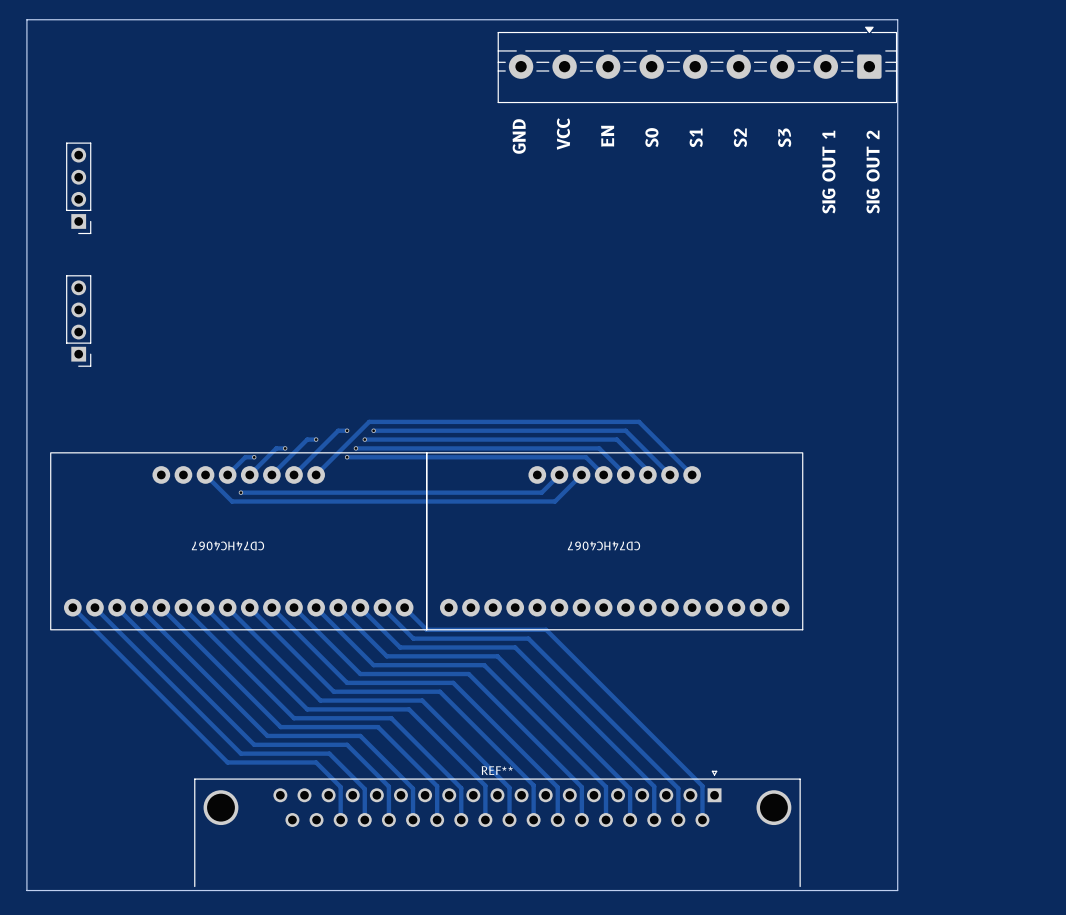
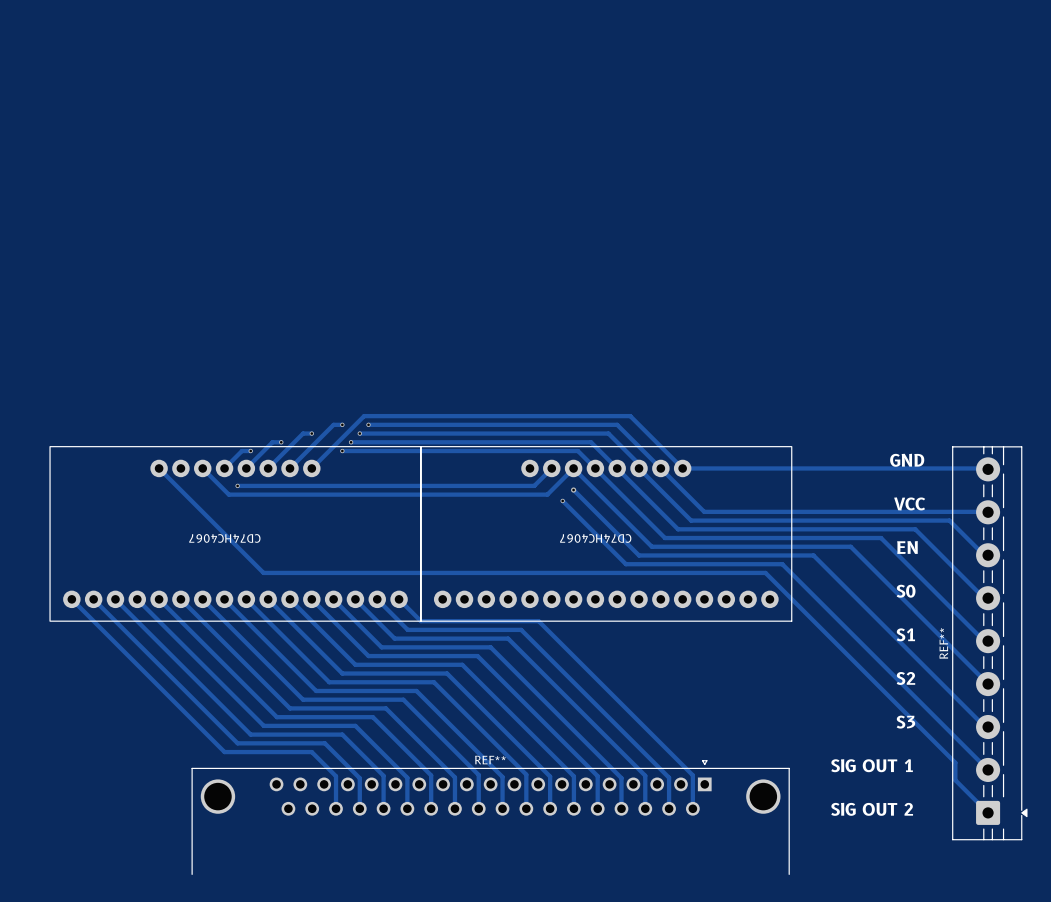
board edge: (26, 19) (897, 19) (897, 890) (26, 890) (26, 19) -> none
part: (697, 64) -> none
text: VCC (563, 134) -> none
text: GND (519, 136) -> none
text: EN (607, 136) -> none
text: S0 (651, 137) -> none
text: S1 (696, 137) -> none
text: S2 (740, 137) -> none
text: S3 (784, 137) -> none
text: SIG OUT 1 (828, 172) -> none
text: SIG OUT 2 (873, 172) -> none
part: (78, 188) -> none
part: (78, 321) -> none
text: none -> GND (907, 460)
track: none -> (159, 468) (263, 572) (765, 572) (955, 762) (955, 780) (988, 812)
track: none -> (573, 468) (651, 546) (850, 546) (988, 684)
track: none -> (595, 468) (664, 538) (881, 538) (983, 640)
track: none -> (617, 468) (678, 529) (915, 529) (983, 597)
track: none -> (639, 468) (691, 520) (949, 520) (983, 554)
track: none -> (660, 468) (704, 511) (983, 511)
track: none -> (682, 468) (983, 468)
track: none -> (573, 490) (639, 555) (813, 555) (985, 727) (988, 727)
via: none -> (573, 490)
track: none -> (562, 500) (625, 564) (782, 564) (988, 769)
via: none -> (562, 500)
text: none -> VCC (909, 503)
text: none -> EN (907, 547)
text: none -> S0 (906, 591)
text: none -> S1 (905, 634)
REF**: none -> (989, 643)
text: none -> S2 (905, 678)
text: none -> S3 (905, 722)
text: none -> SIG OUT 1 (872, 765)
text: none -> SIG OUT 2 (872, 809)

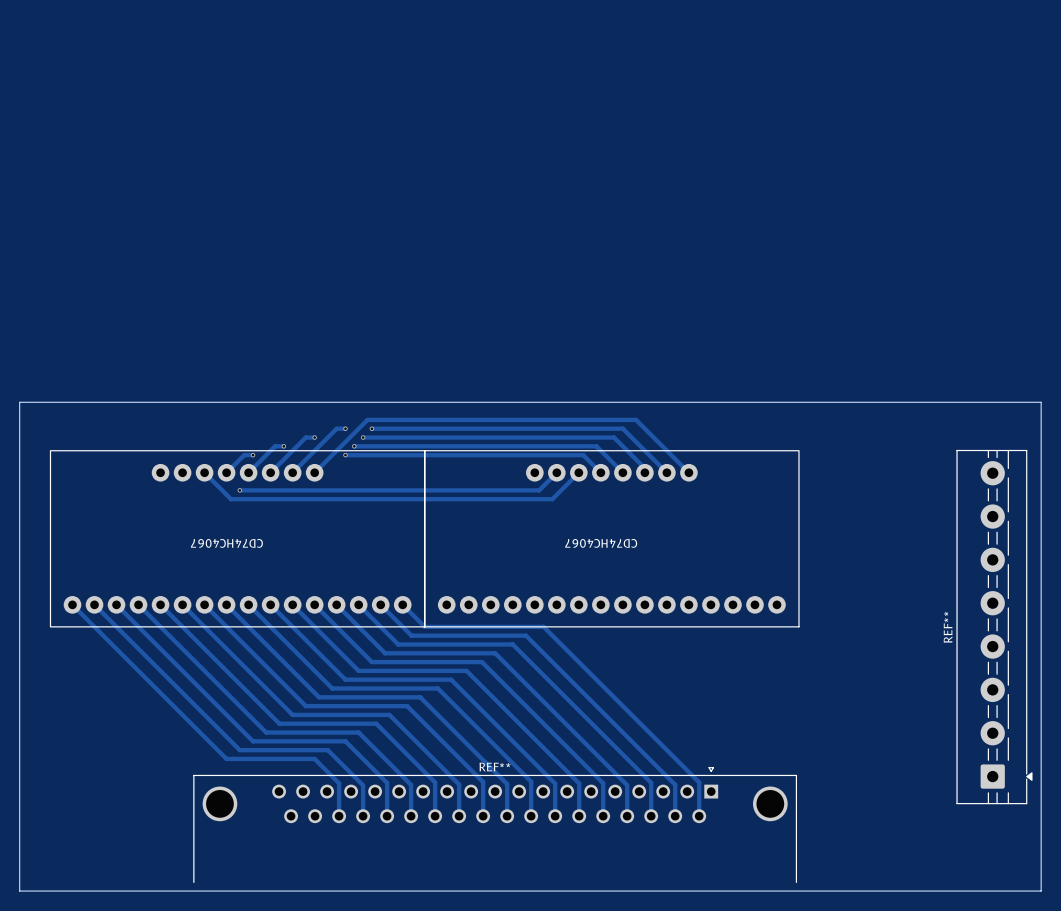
board edge: none -> (19, 402) (1041, 402) (1041, 891) (19, 891) (19, 402)
text: GND (907, 460) -> none
track: (159, 468) (263, 572) (765, 572) (955, 762) (955, 780) (988, 812) -> none
track: (573, 468) (651, 546) (850, 546) (988, 684) -> none
track: (595, 468) (664, 538) (881, 538) (983, 640) -> none
track: (617, 468) (678, 529) (915, 529) (983, 597) -> none
track: (639, 468) (691, 520) (949, 520) (983, 554) -> none
track: (660, 468) (704, 511) (983, 511) -> none
track: (682, 468) (983, 468) -> none
track: (573, 490) (639, 555) (813, 555) (985, 727) (988, 727) -> none
via: (573, 490) -> none
track: (562, 500) (625, 564) (782, 564) (988, 769) -> none
via: (562, 500) -> none
text: VCC (909, 503) -> none
text: EN (907, 547) -> none
text: S0 (906, 591) -> none
REF**: none -> (994, 627)
text: S1 (905, 634) -> none
REF**: (989, 643) -> none
text: S2 (905, 678) -> none
text: S3 (905, 722) -> none
text: SIG OUT 1 (872, 765) -> none
text: SIG OUT 2 (872, 809) -> none

